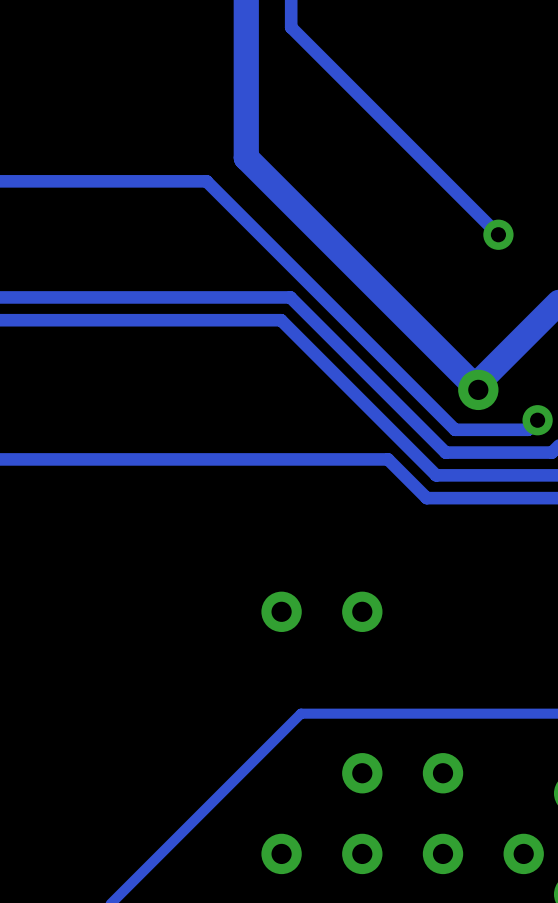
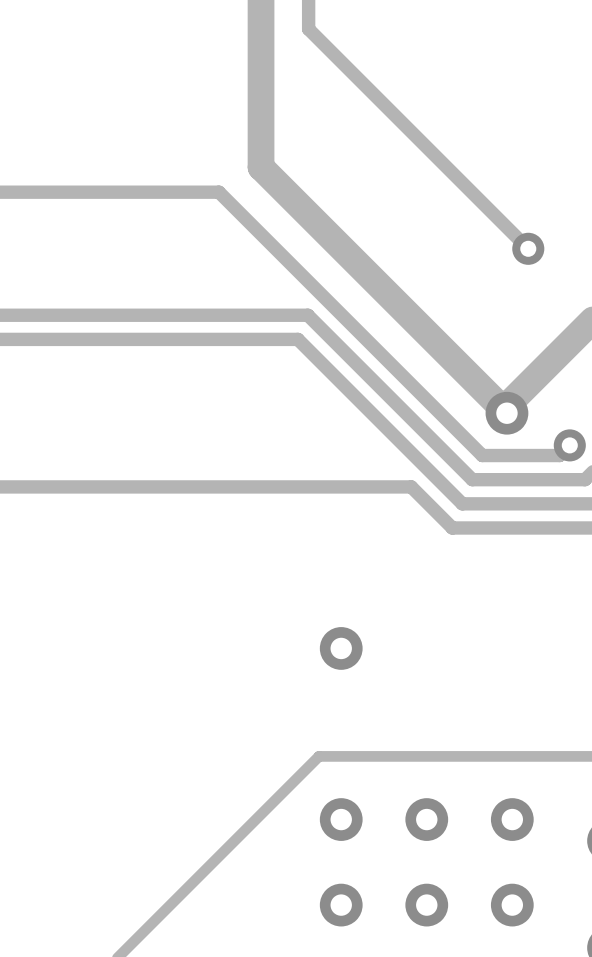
via: (281, 611) -> none
via: none -> (341, 648)
via: (362, 611) -> none
via position: (362, 773) -> (341, 819)
via position: (443, 773) -> (426, 819)
via: none -> (512, 819)
via: (281, 853) -> none
via: none -> (341, 905)
via: (362, 853) -> none
via position: (443, 853) -> (426, 905)
via position: (523, 853) -> (512, 905)

